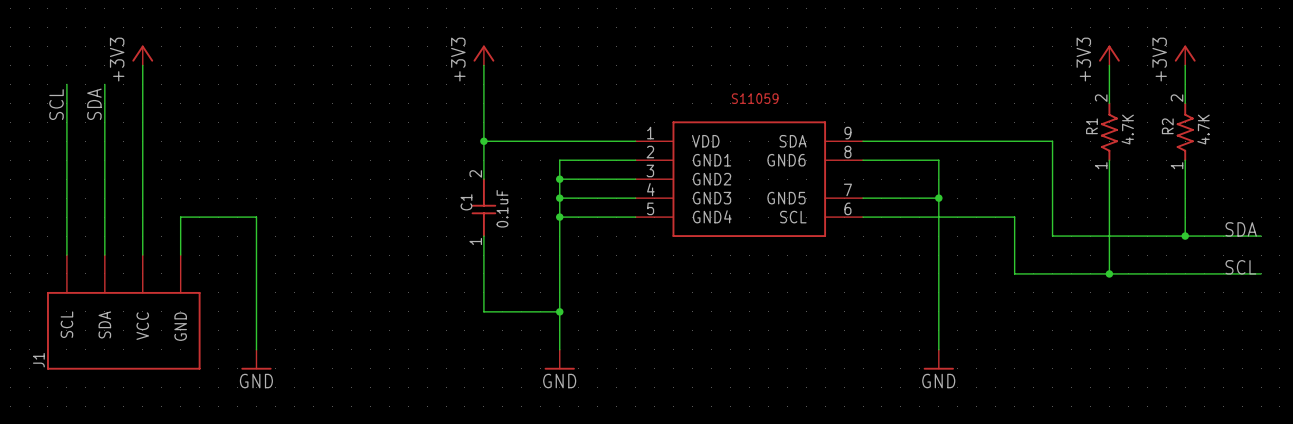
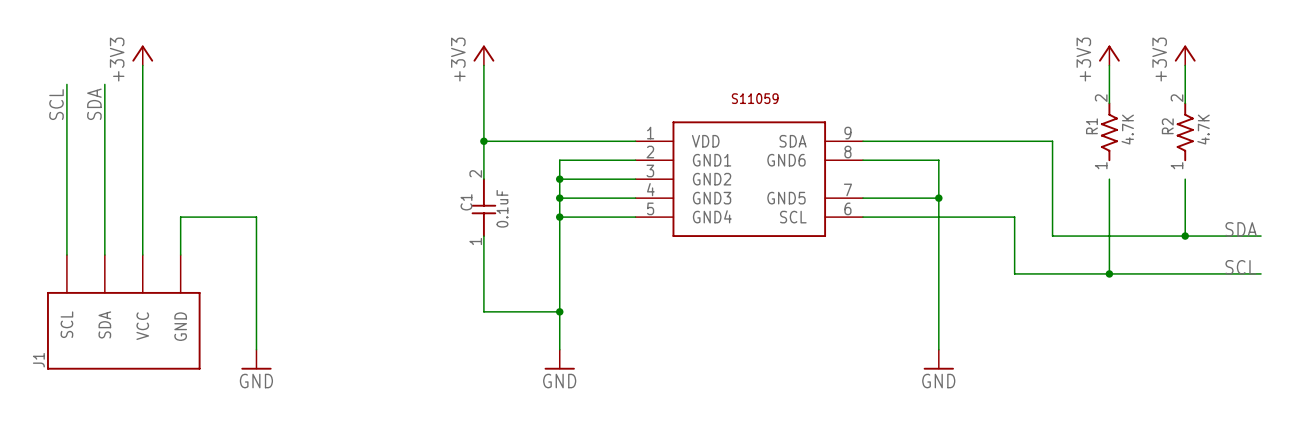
wire: (1109, 160) (1109, 179) -> none
wire: (1185, 160) (1185, 179) -> none

